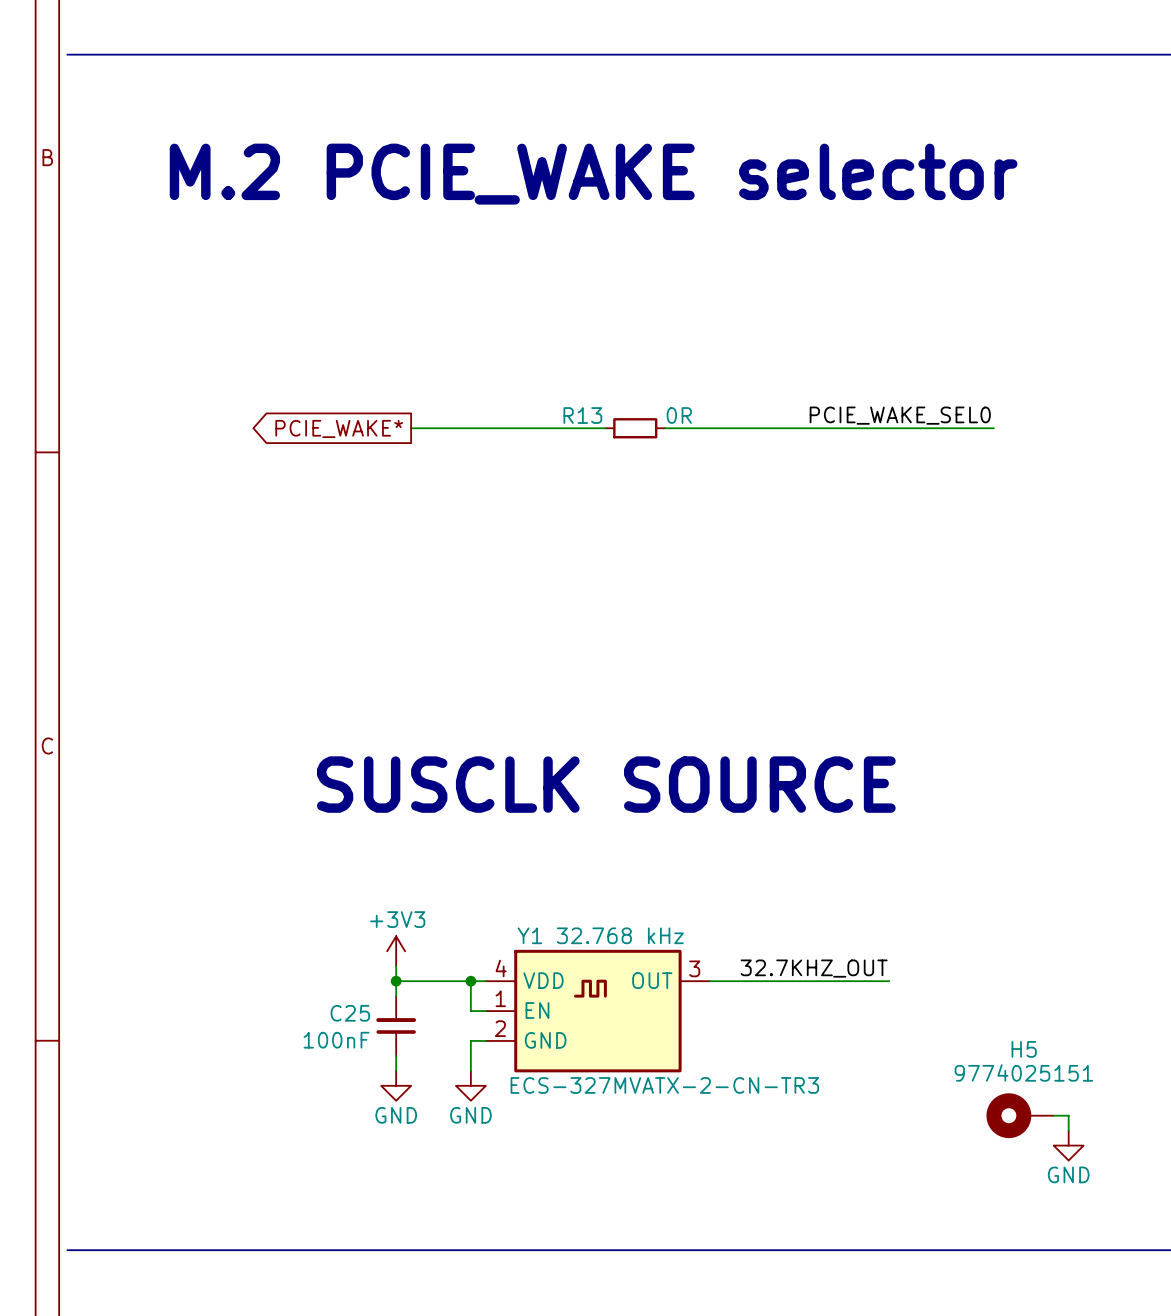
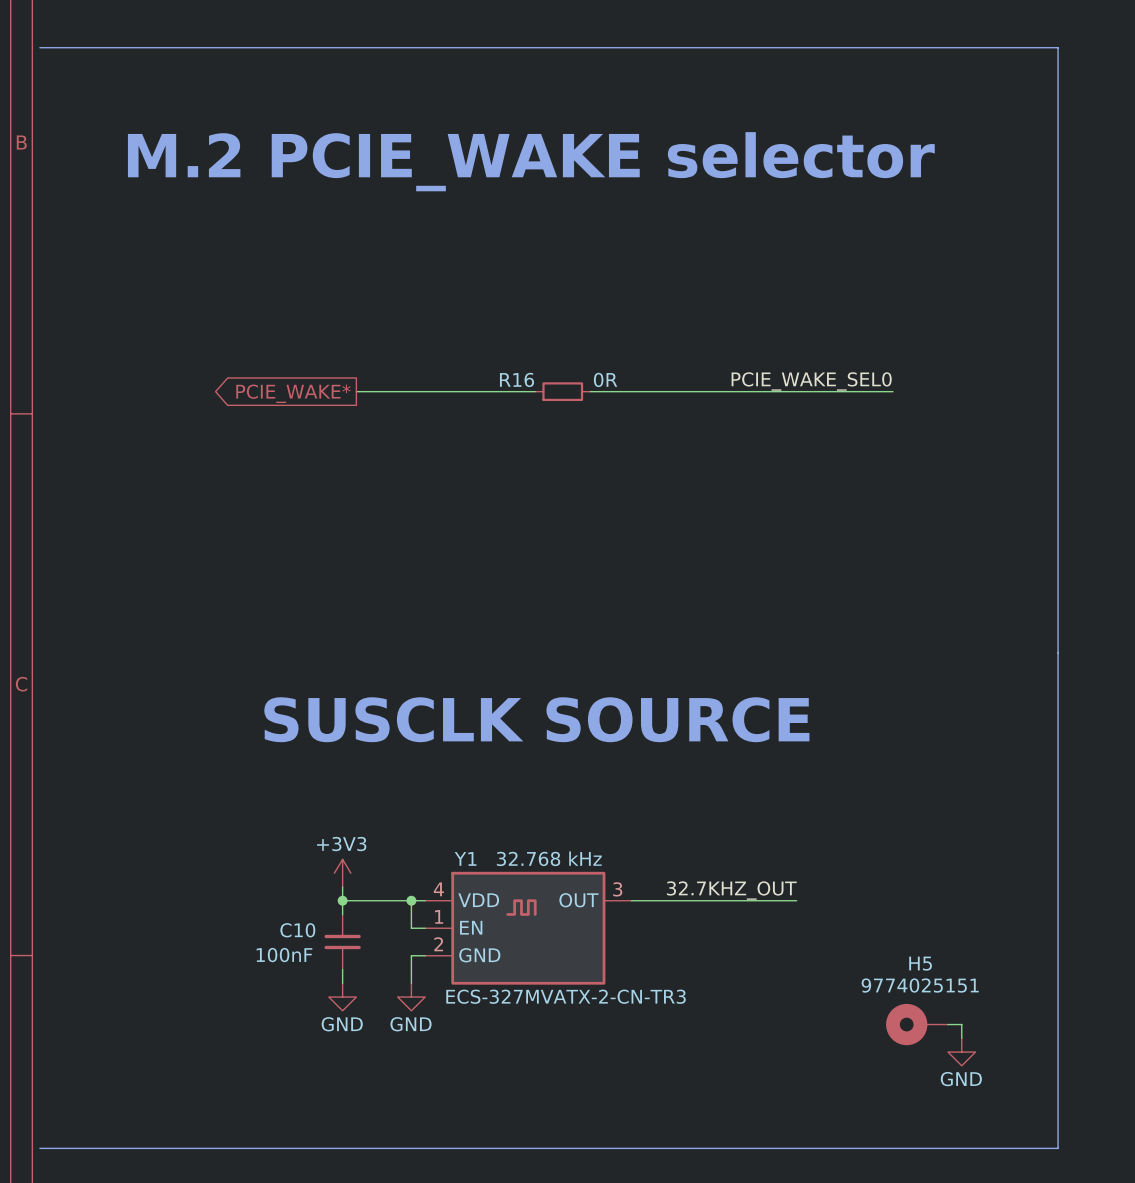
R13 name: R13 (582, 415) -> R16 (517, 379)
C25: 100nF (396, 1026) -> none
C10: none -> 100nF (342, 942)

